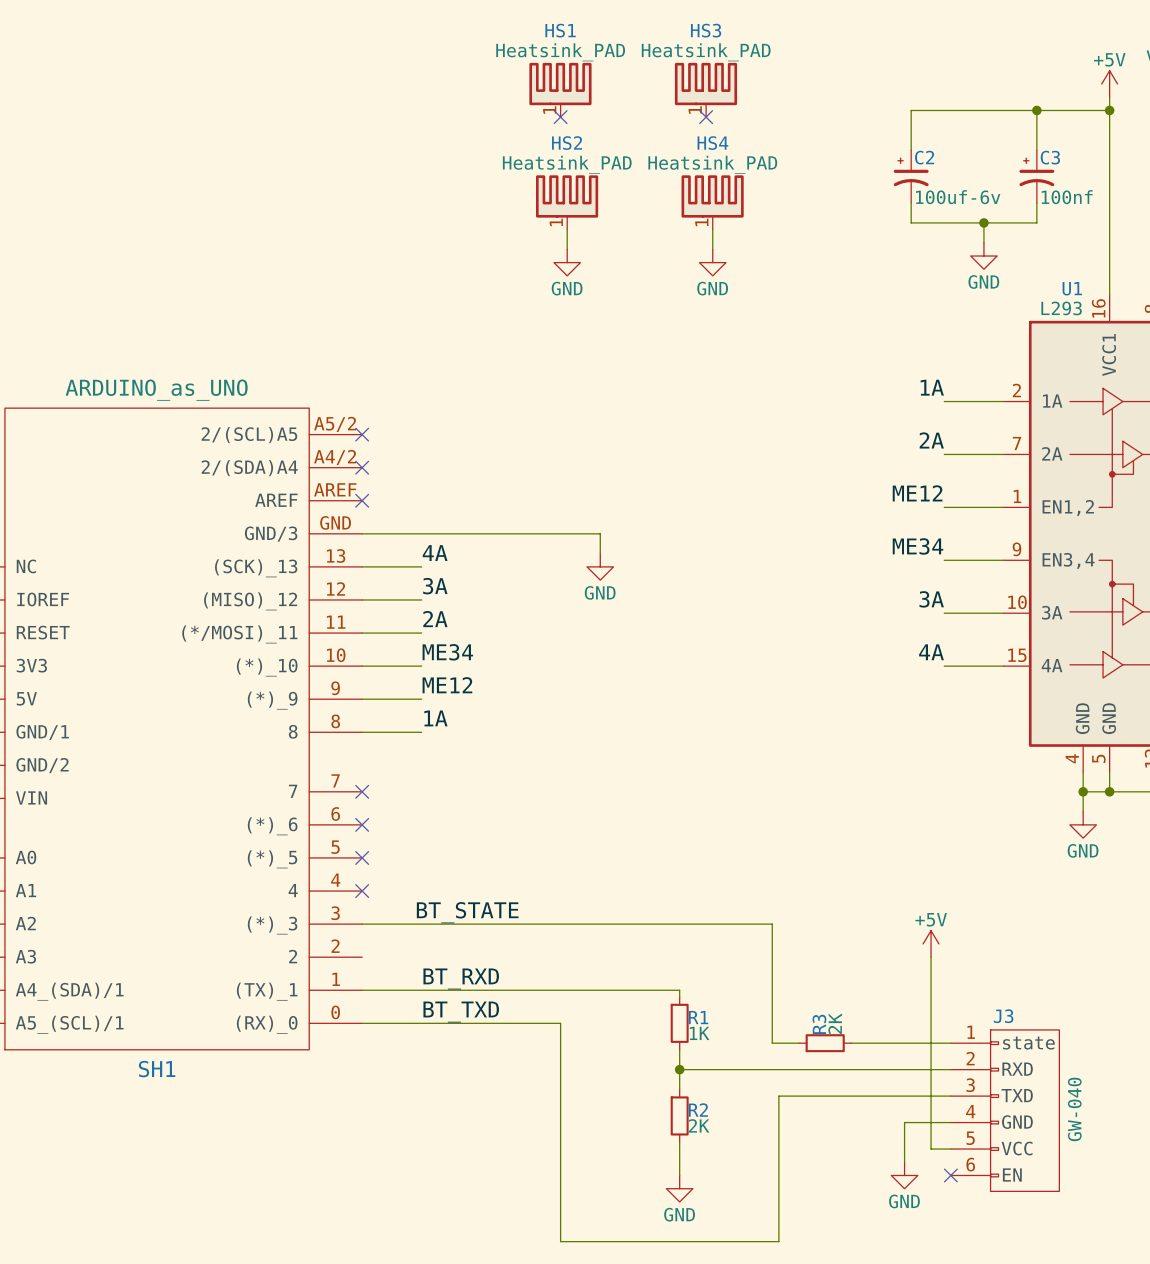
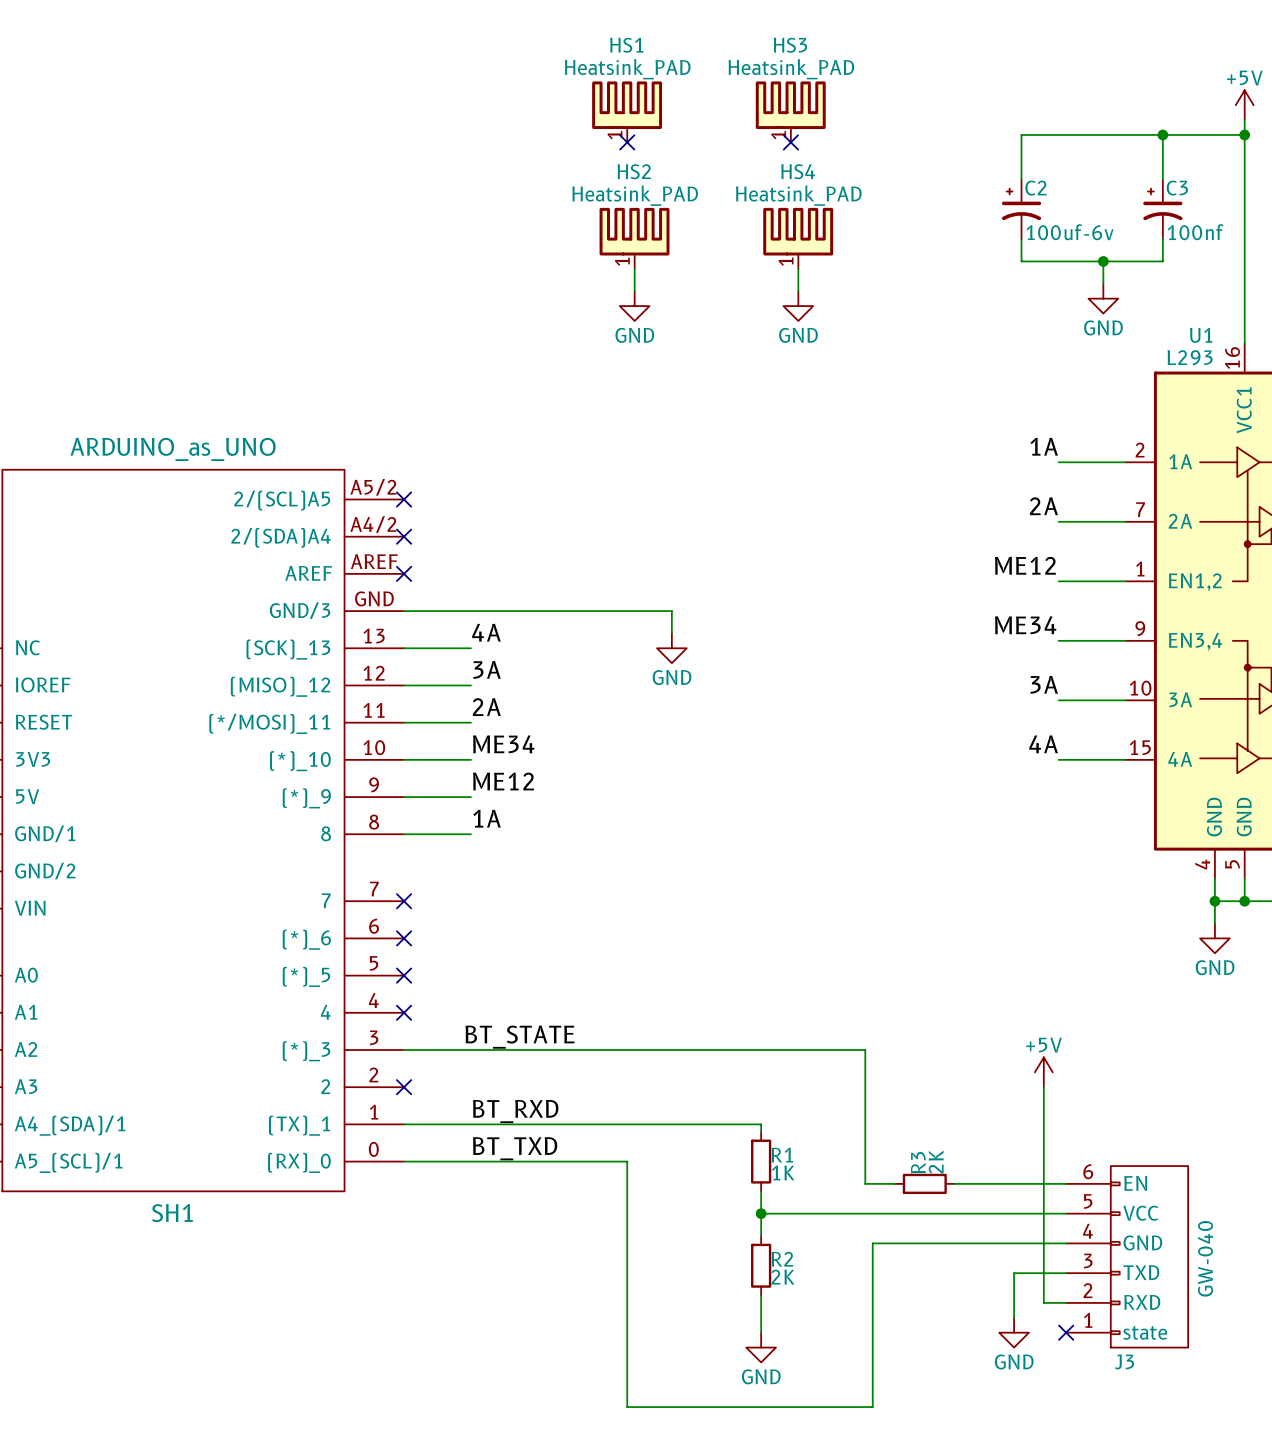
no-connect mark: none -> (404, 1087)
J3 flip: as is (1024, 1110) -> up-down (1149, 1256)

